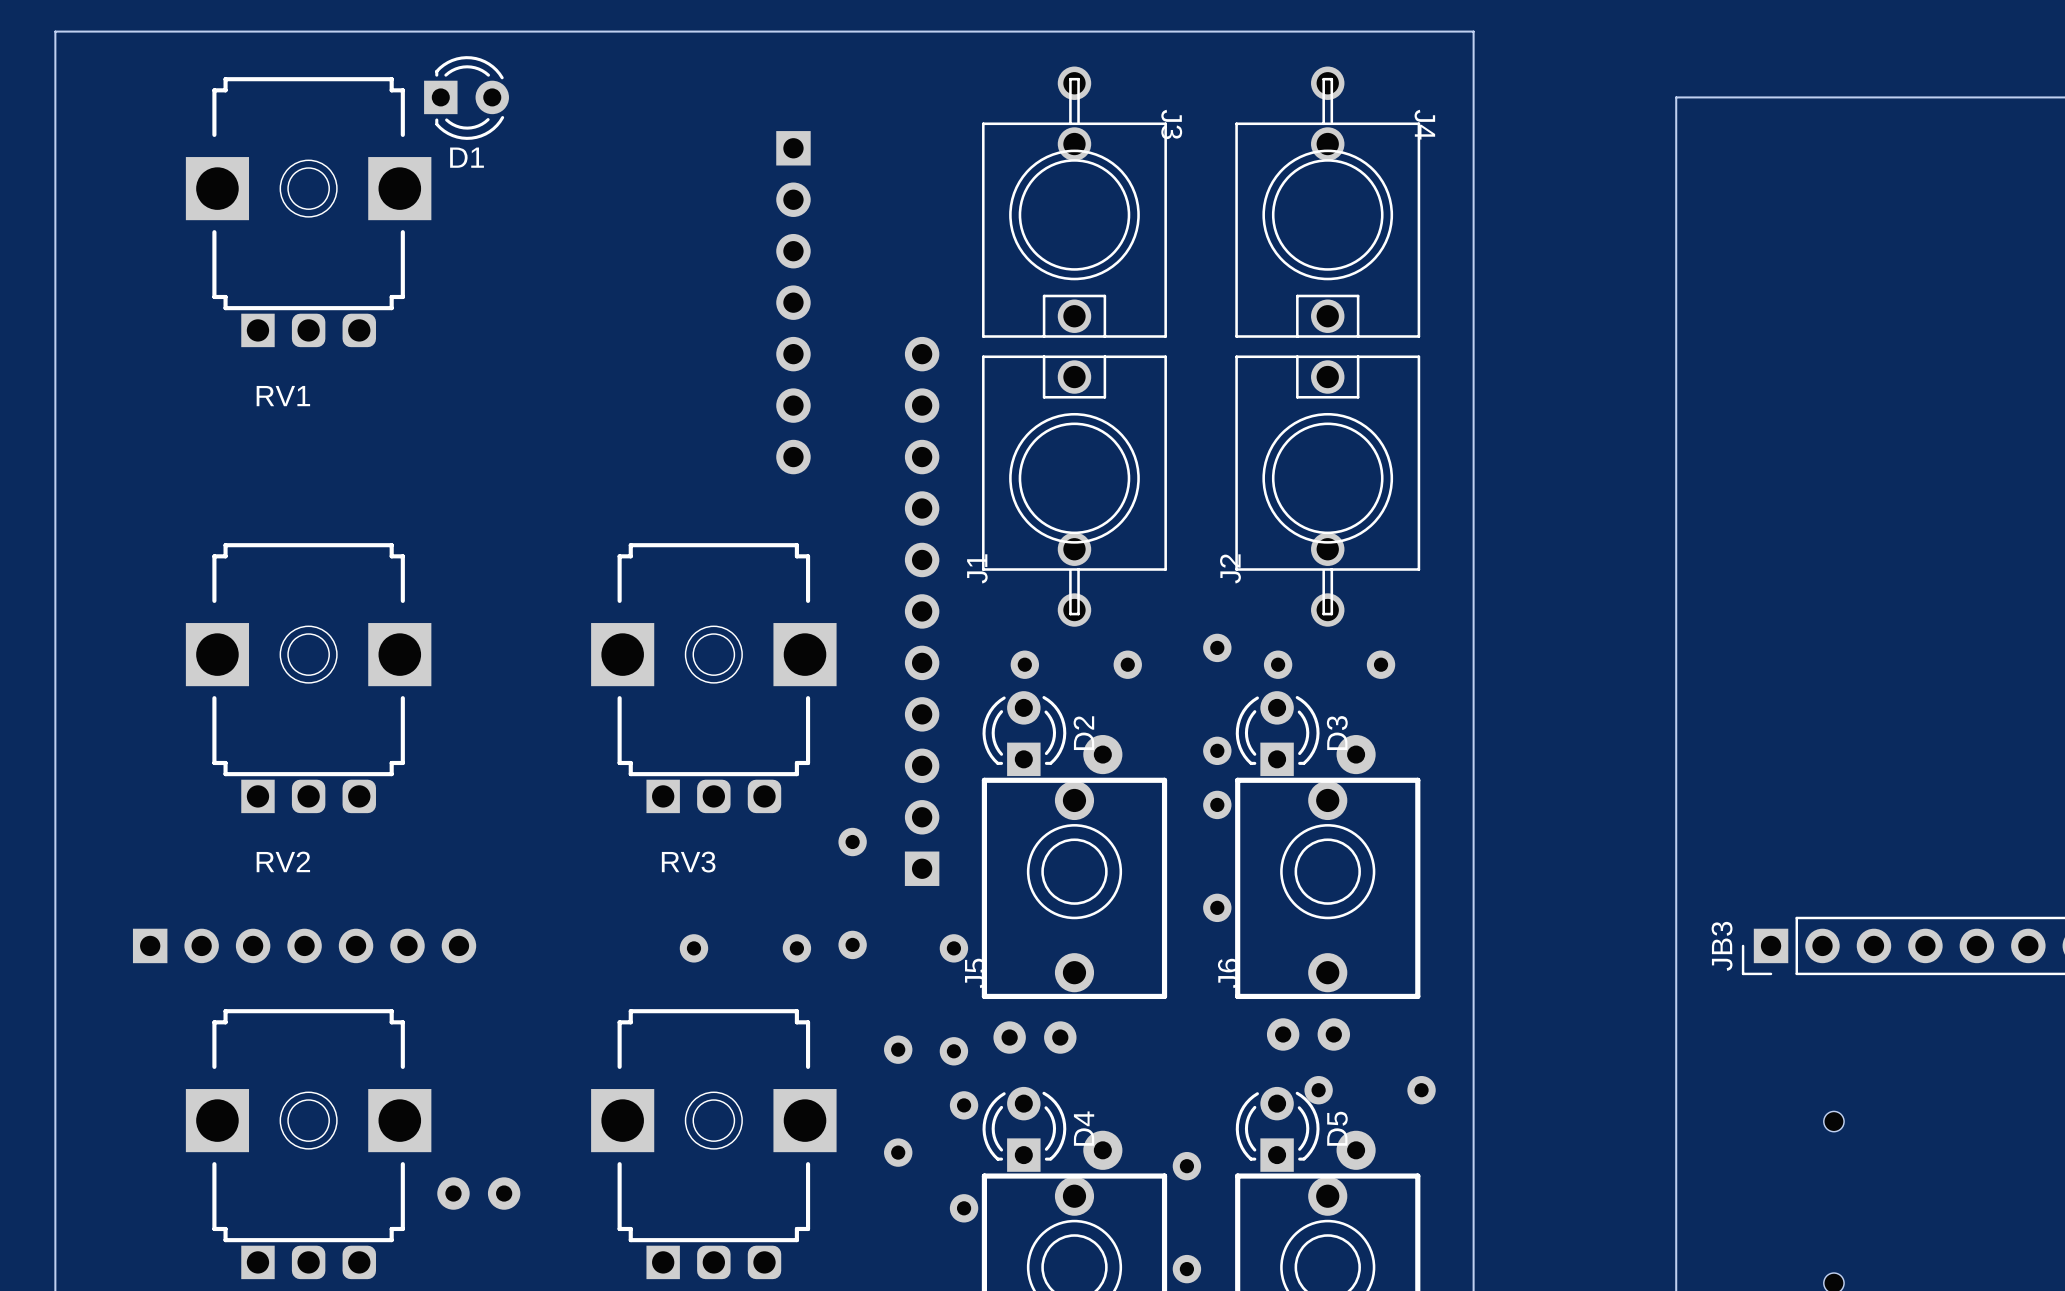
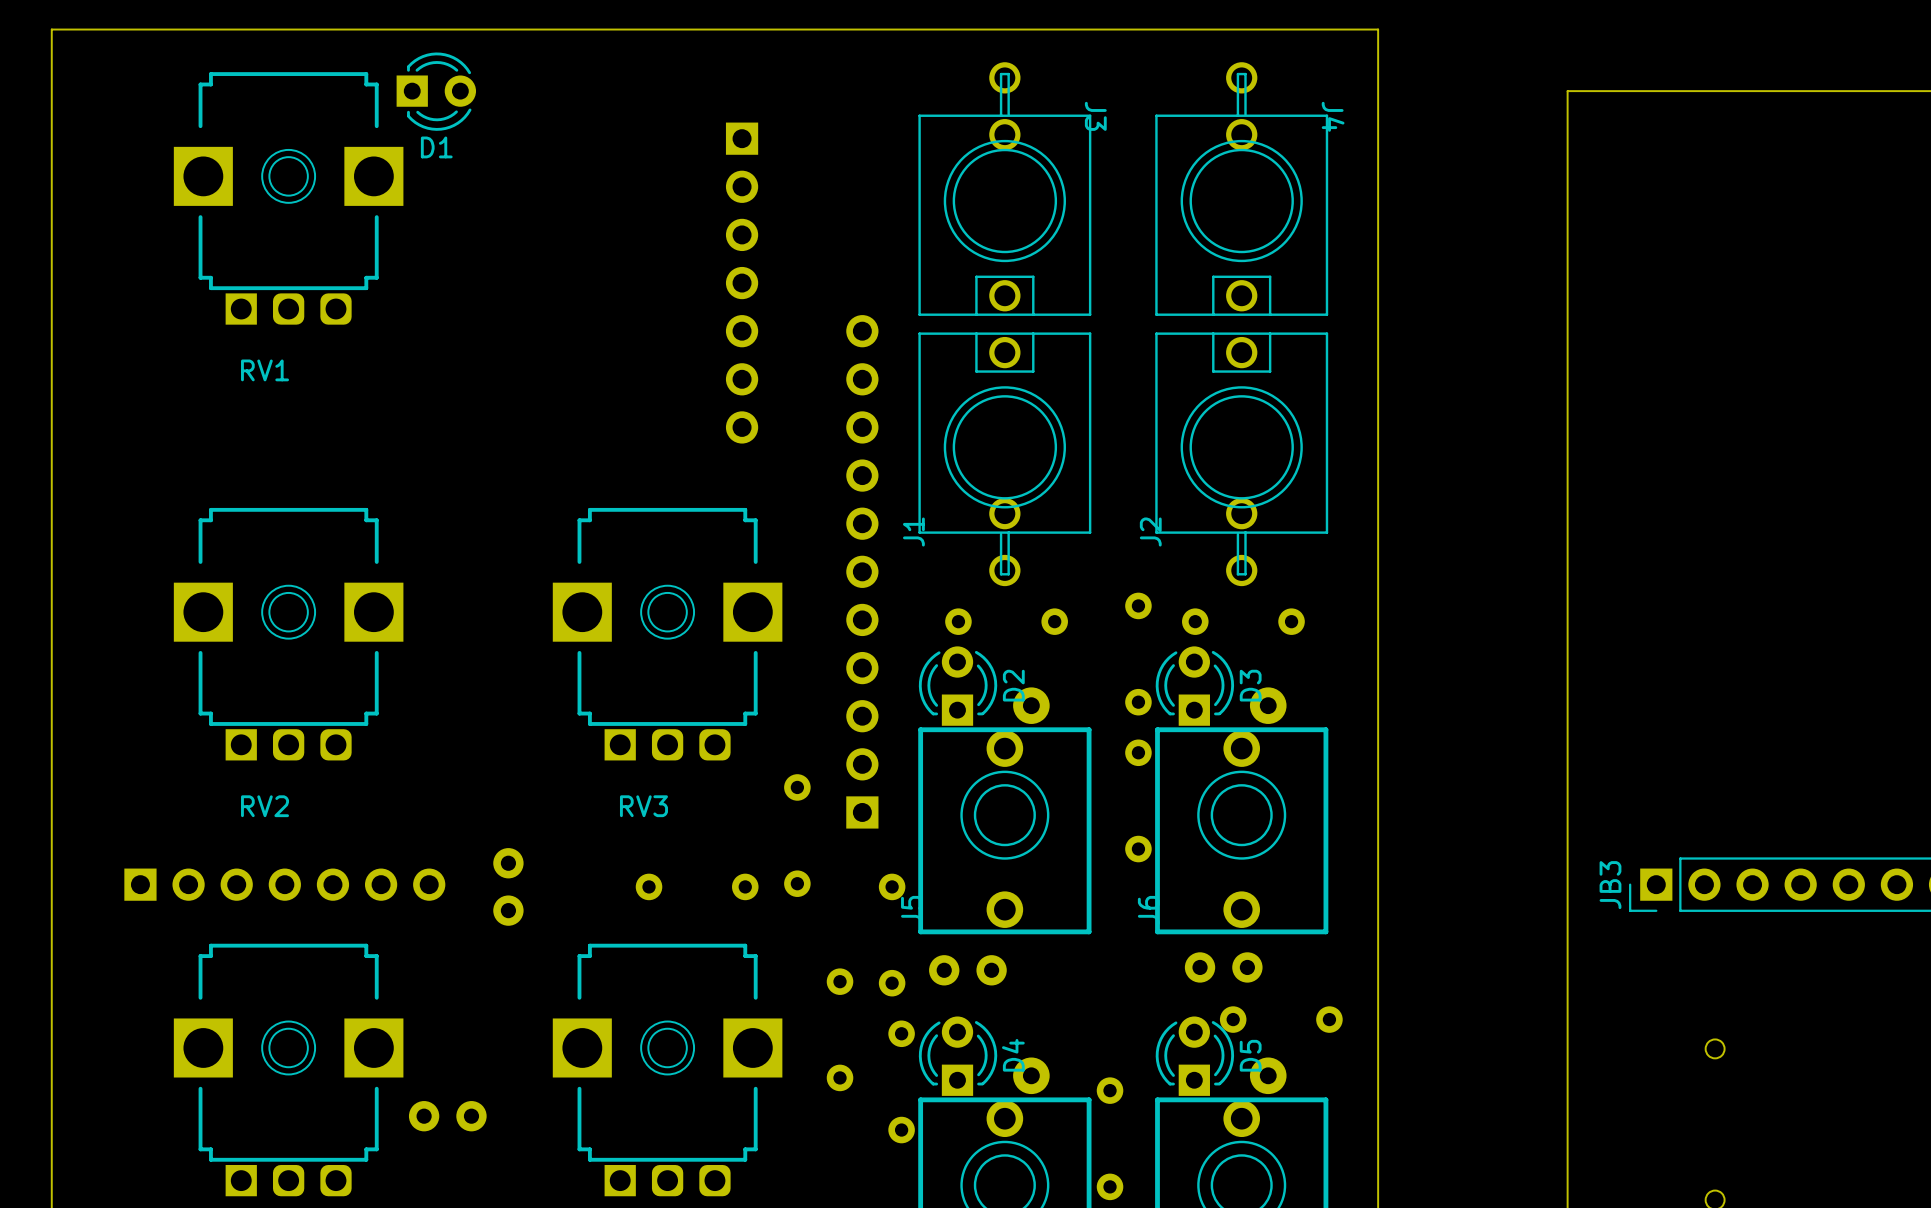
part: none -> (508, 886)

